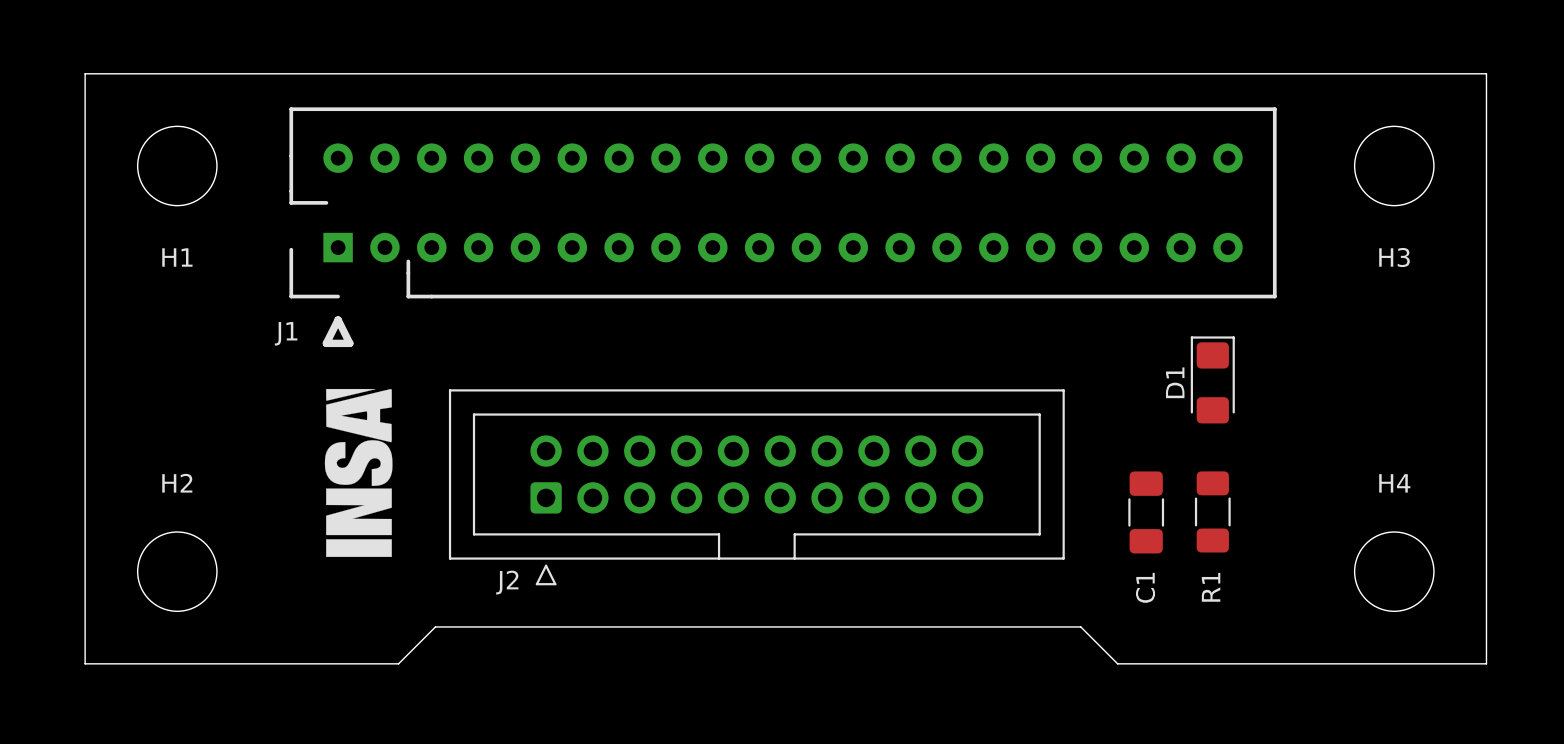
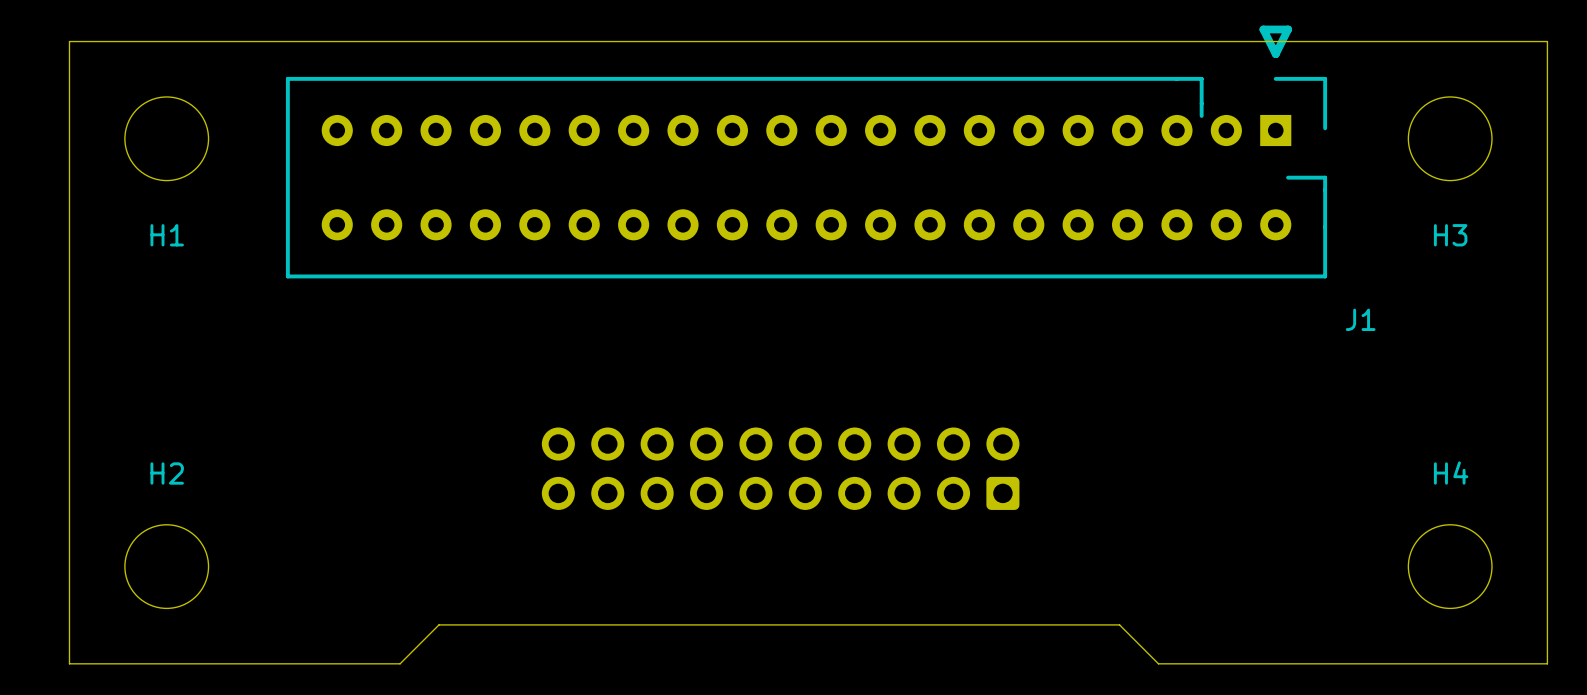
J1 rotation: 0° (783, 227) -> 180° (806, 151)
J1 name position: J1 (286, 333) -> J1 (1360, 319)
D1: (1212, 379) -> none
drawing: [324, 388, 393, 557] -> none
J2 side: top (756, 487) -> bottom (780, 468)
R1: (1212, 511) -> none
C1: (1146, 512) -> none

